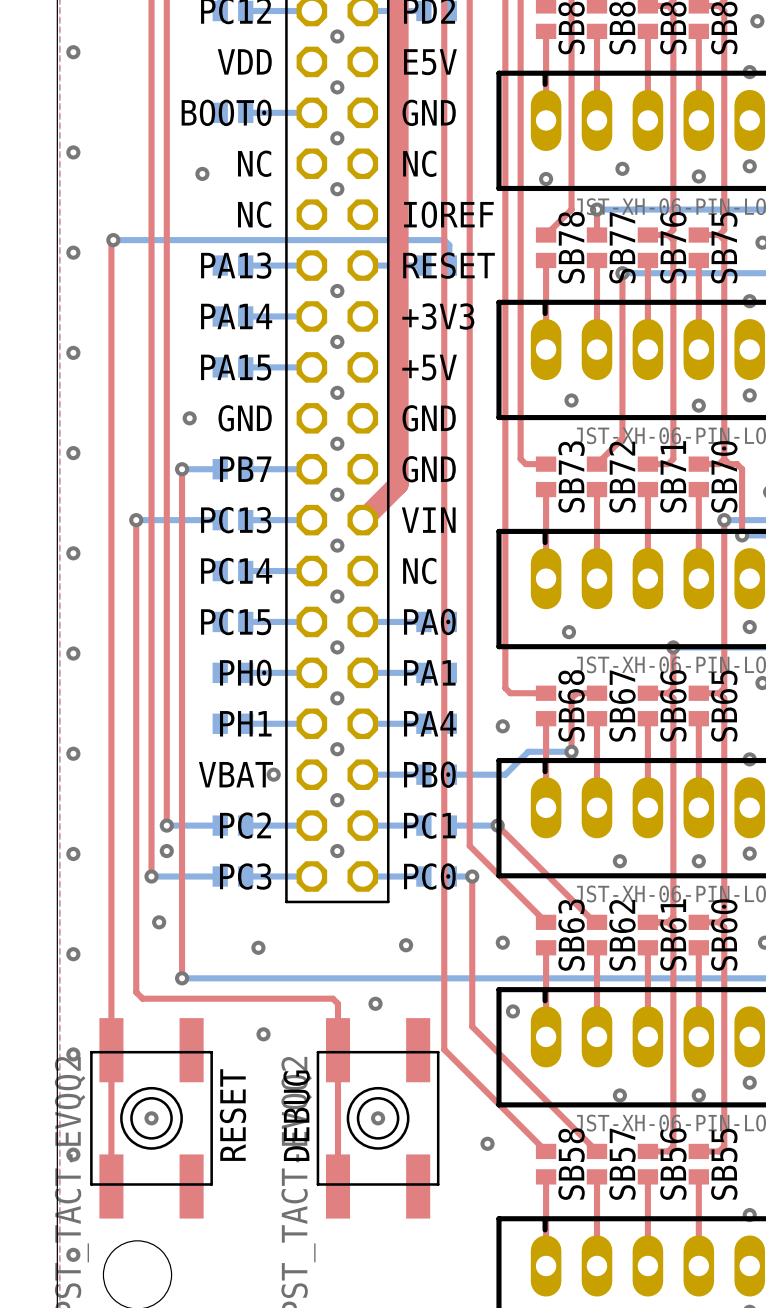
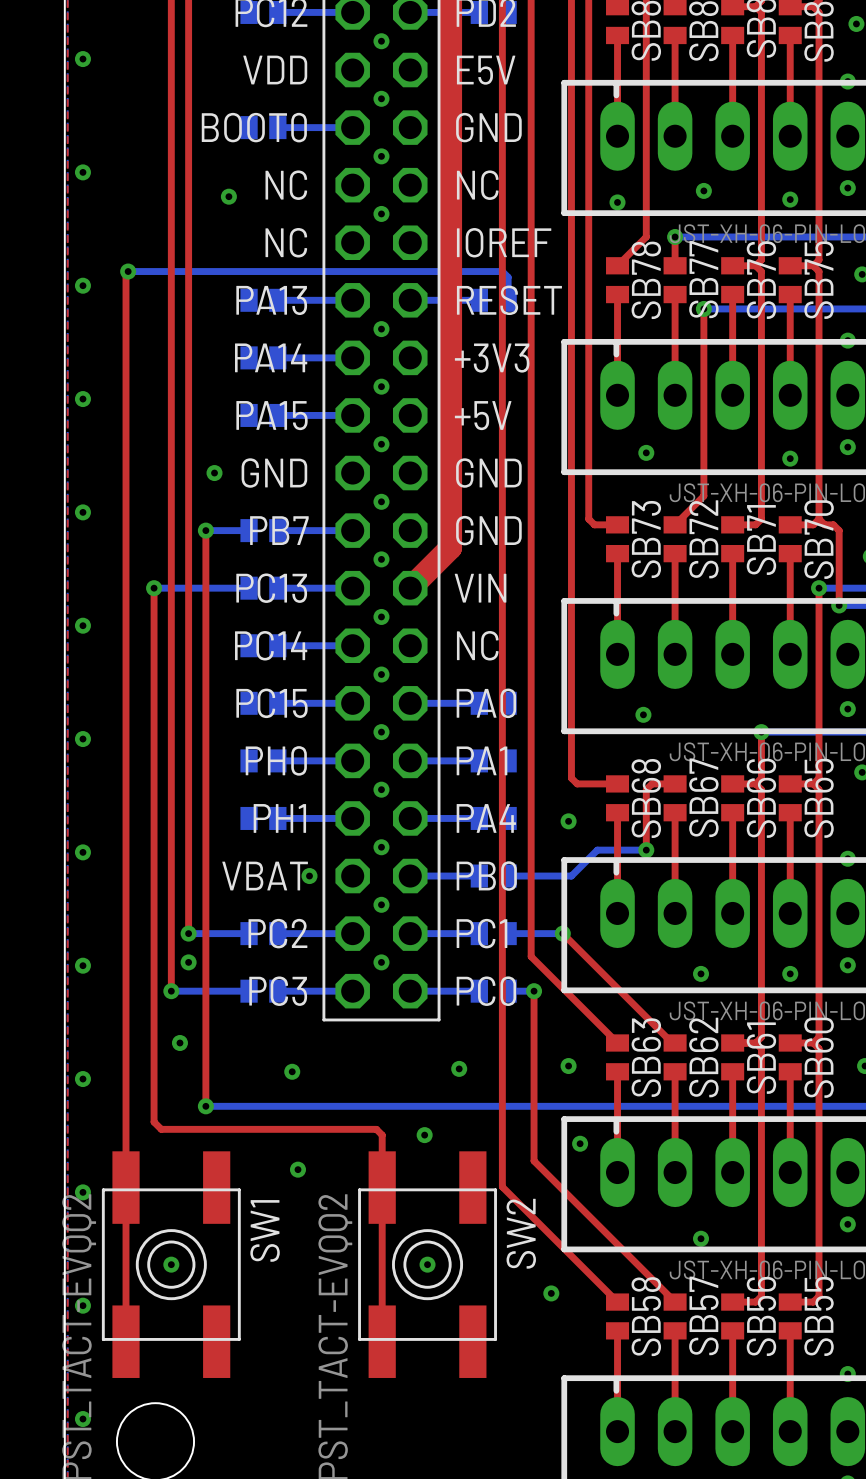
SW1 name: none -> SW1 (265, 1230)
SW2 name: none -> SW2 (521, 1233)
via: (698, 1095) -> none
text: RESET (232, 1115) -> none
text: DEBUG (296, 1115) -> none

